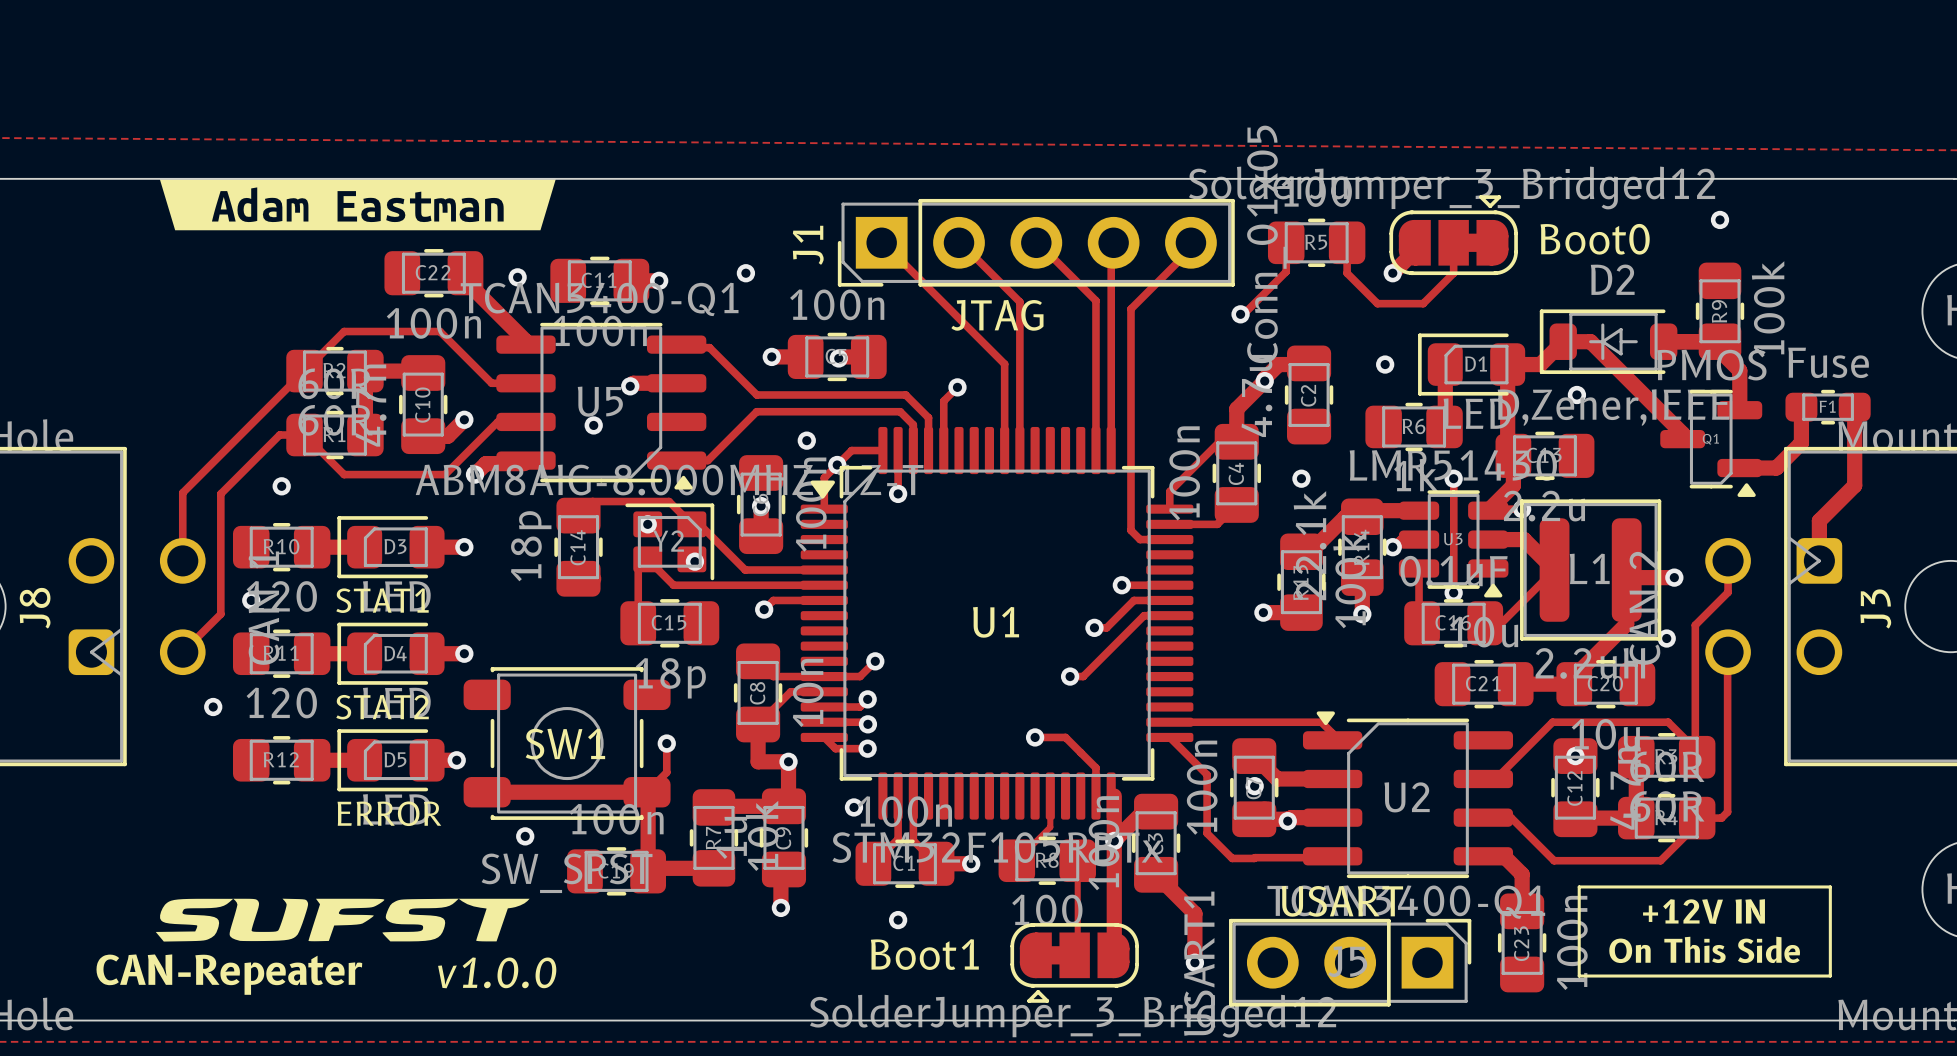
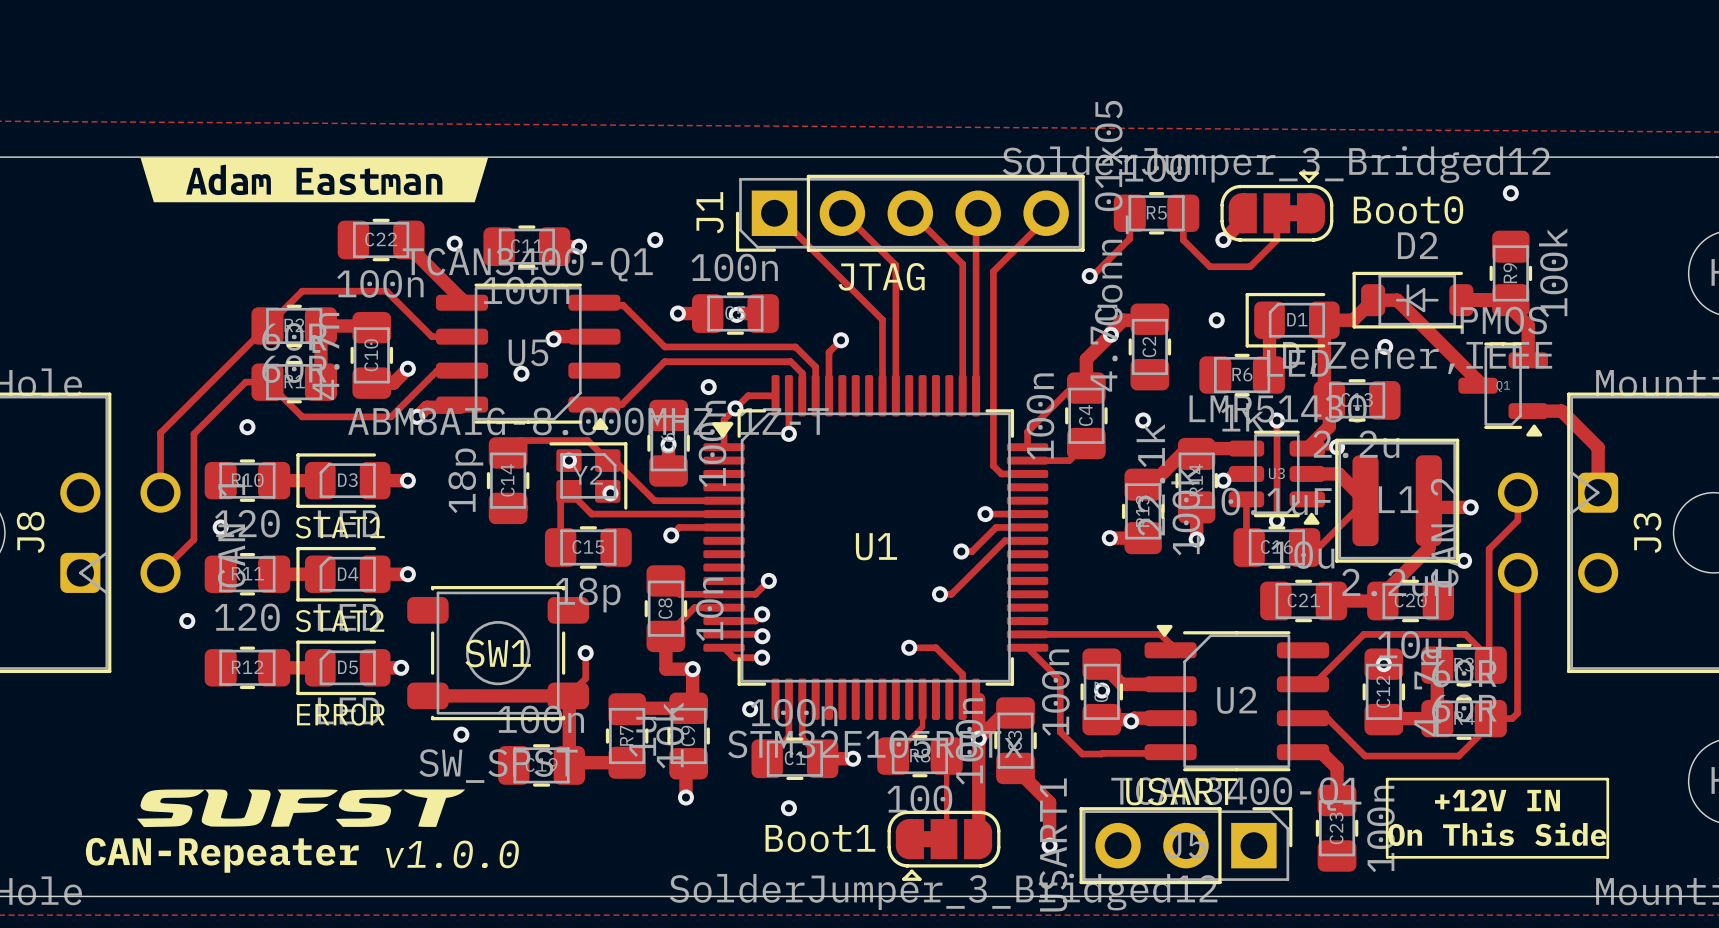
track: (1801, 407) (1801, 442) (1776, 468) -> none
F1: Fuse (1828, 407) -> none
track: (1854, 407) (1854, 485) (1819, 520) -> (1560, 411) (1598, 447) (1598, 457)

